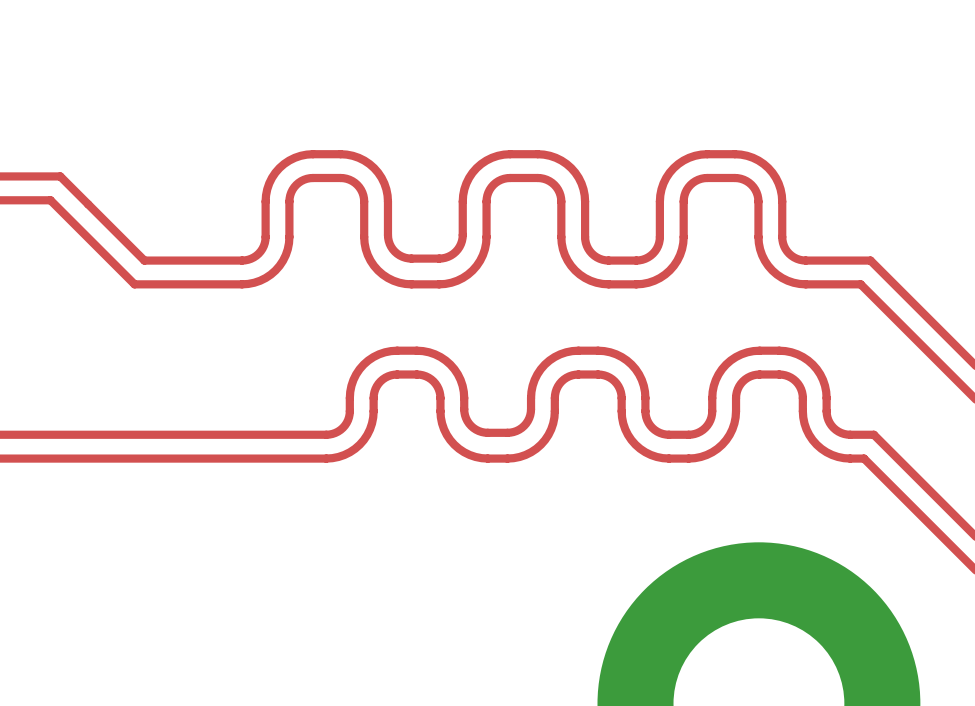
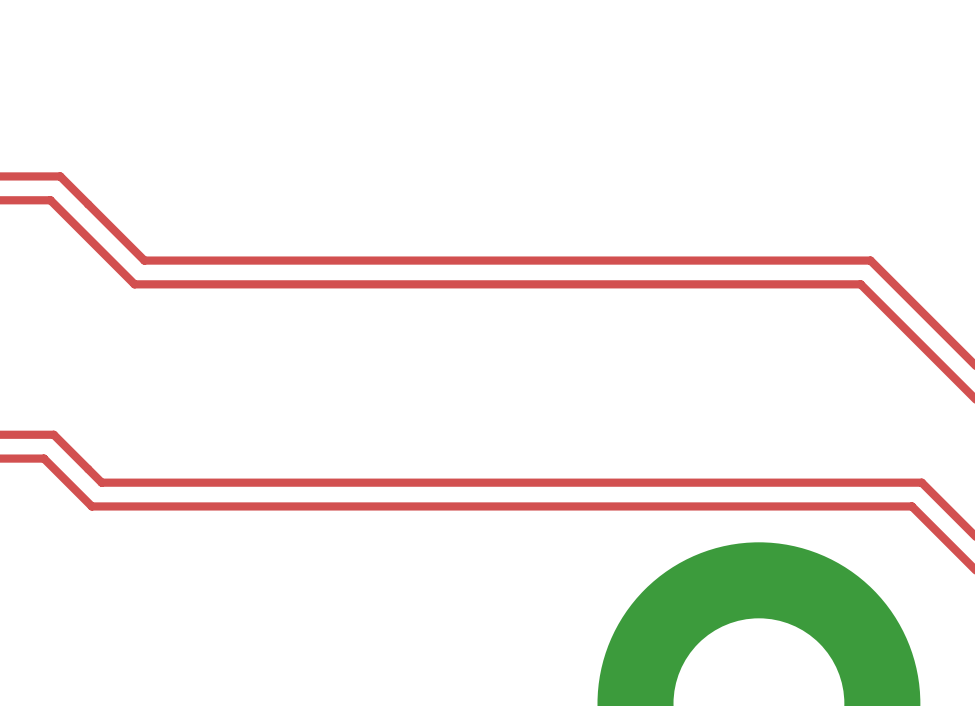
track: (242, 260) (253, 257) (263, 246) (266, 195) (271, 177) (279, 168) (289, 160) (300, 155) (312, 154) (352, 155) (364, 160) (374, 168) (381, 177) (386, 189) (389, 244) (399, 255) (411, 258) (445, 257) (457, 249) (462, 238) (464, 189) (469, 177) (481, 163) (491, 157) (503, 154) (537, 154) (555, 157) (571, 168) (581, 183) (584, 195) (585, 240) (588, 248) (596, 257) (608, 260) -> (242, 260) (608, 260)
track: (636, 260) (648, 257) (658, 246) (660, 195) (666, 177) (673, 168) (683, 160) (694, 155) (707, 154) (747, 155) (758, 160) (768, 168) (775, 177) (780, 189) (784, 246) (791, 255) (805, 260) -> (636, 260) (805, 260)
track: (242, 284) (254, 282) (265, 278) (275, 270) (283, 260) (289, 243) (291, 192) (301, 181) (312, 177) (343, 178) (357, 184) (363, 198) (364, 243) (370, 260) (378, 270) (387, 278) (399, 282) (411, 284) -> (242, 284) (411, 284)
track: (439, 284) (451, 282) (462, 278) (472, 270) (480, 260) (486, 243) (488, 192) (498, 181) (510, 177) (540, 178) (554, 184) (561, 198) (561, 243) (567, 260) (575, 270) (585, 278) (596, 282) (608, 284) -> (439, 284) (608, 284)
track: (636, 284) (648, 282) (659, 278) (669, 270) (677, 260) (683, 243) (685, 192) (695, 181) (707, 177) (737, 178) (751, 184) (758, 198) (758, 243) (764, 260) (772, 270) (782, 278) (793, 282) (805, 284) -> (636, 284) (805, 284)
track: (53, 434) (332, 433) (342, 427) (348, 420) (351, 385) (359, 369) (373, 357) (384, 352) (397, 350) (429, 352) (440, 357) (450, 364) (457, 374) (462, 385) (464, 412) (467, 421) (476, 429) (487, 432) (510, 432) (524, 425) (530, 415) (531, 391) (534, 379) (540, 369) (554, 357) (572, 351) (610, 352) (626, 360) (639, 374) (645, 391) (646, 417) (652, 427) (665, 434) (691, 434) (703, 429) (710, 420) (713, 385) (718, 374) (726, 364) (735, 357) (747, 352) (779, 350) (791, 352) (802, 357) (816, 369) (825, 385) (827, 417) (833, 427) (847, 434) (873, 434) (921, 482) -> (53, 434) (101, 482) (921, 482)
track: (43, 458) (326, 458) (338, 456) (349, 452) (363, 440) (372, 423) (373, 395) (376, 386) (385, 377) (397, 374) (419, 374) (433, 381) (439, 391) (440, 417) (446, 434) (458, 448) (475, 456) (513, 458) (525, 454) (536, 448) (545, 440) (551, 429) (554, 417) (555, 395) (559, 383) (572, 375) (598, 374) (609, 377) (618, 386) (621, 395) (622, 417) (625, 429) (631, 440) (640, 448) (650, 454) (662, 458) (694, 458) (706, 454) (717, 448) (729, 434) (735, 417) (736, 391) (742, 381) (756, 374) (779, 374) (791, 377) (799, 386) (802, 395) (804, 423) (809, 434) (816, 444) (826, 452) (837, 456) (864, 458) (911, 506) -> (43, 458) (91, 506) (911, 506)

